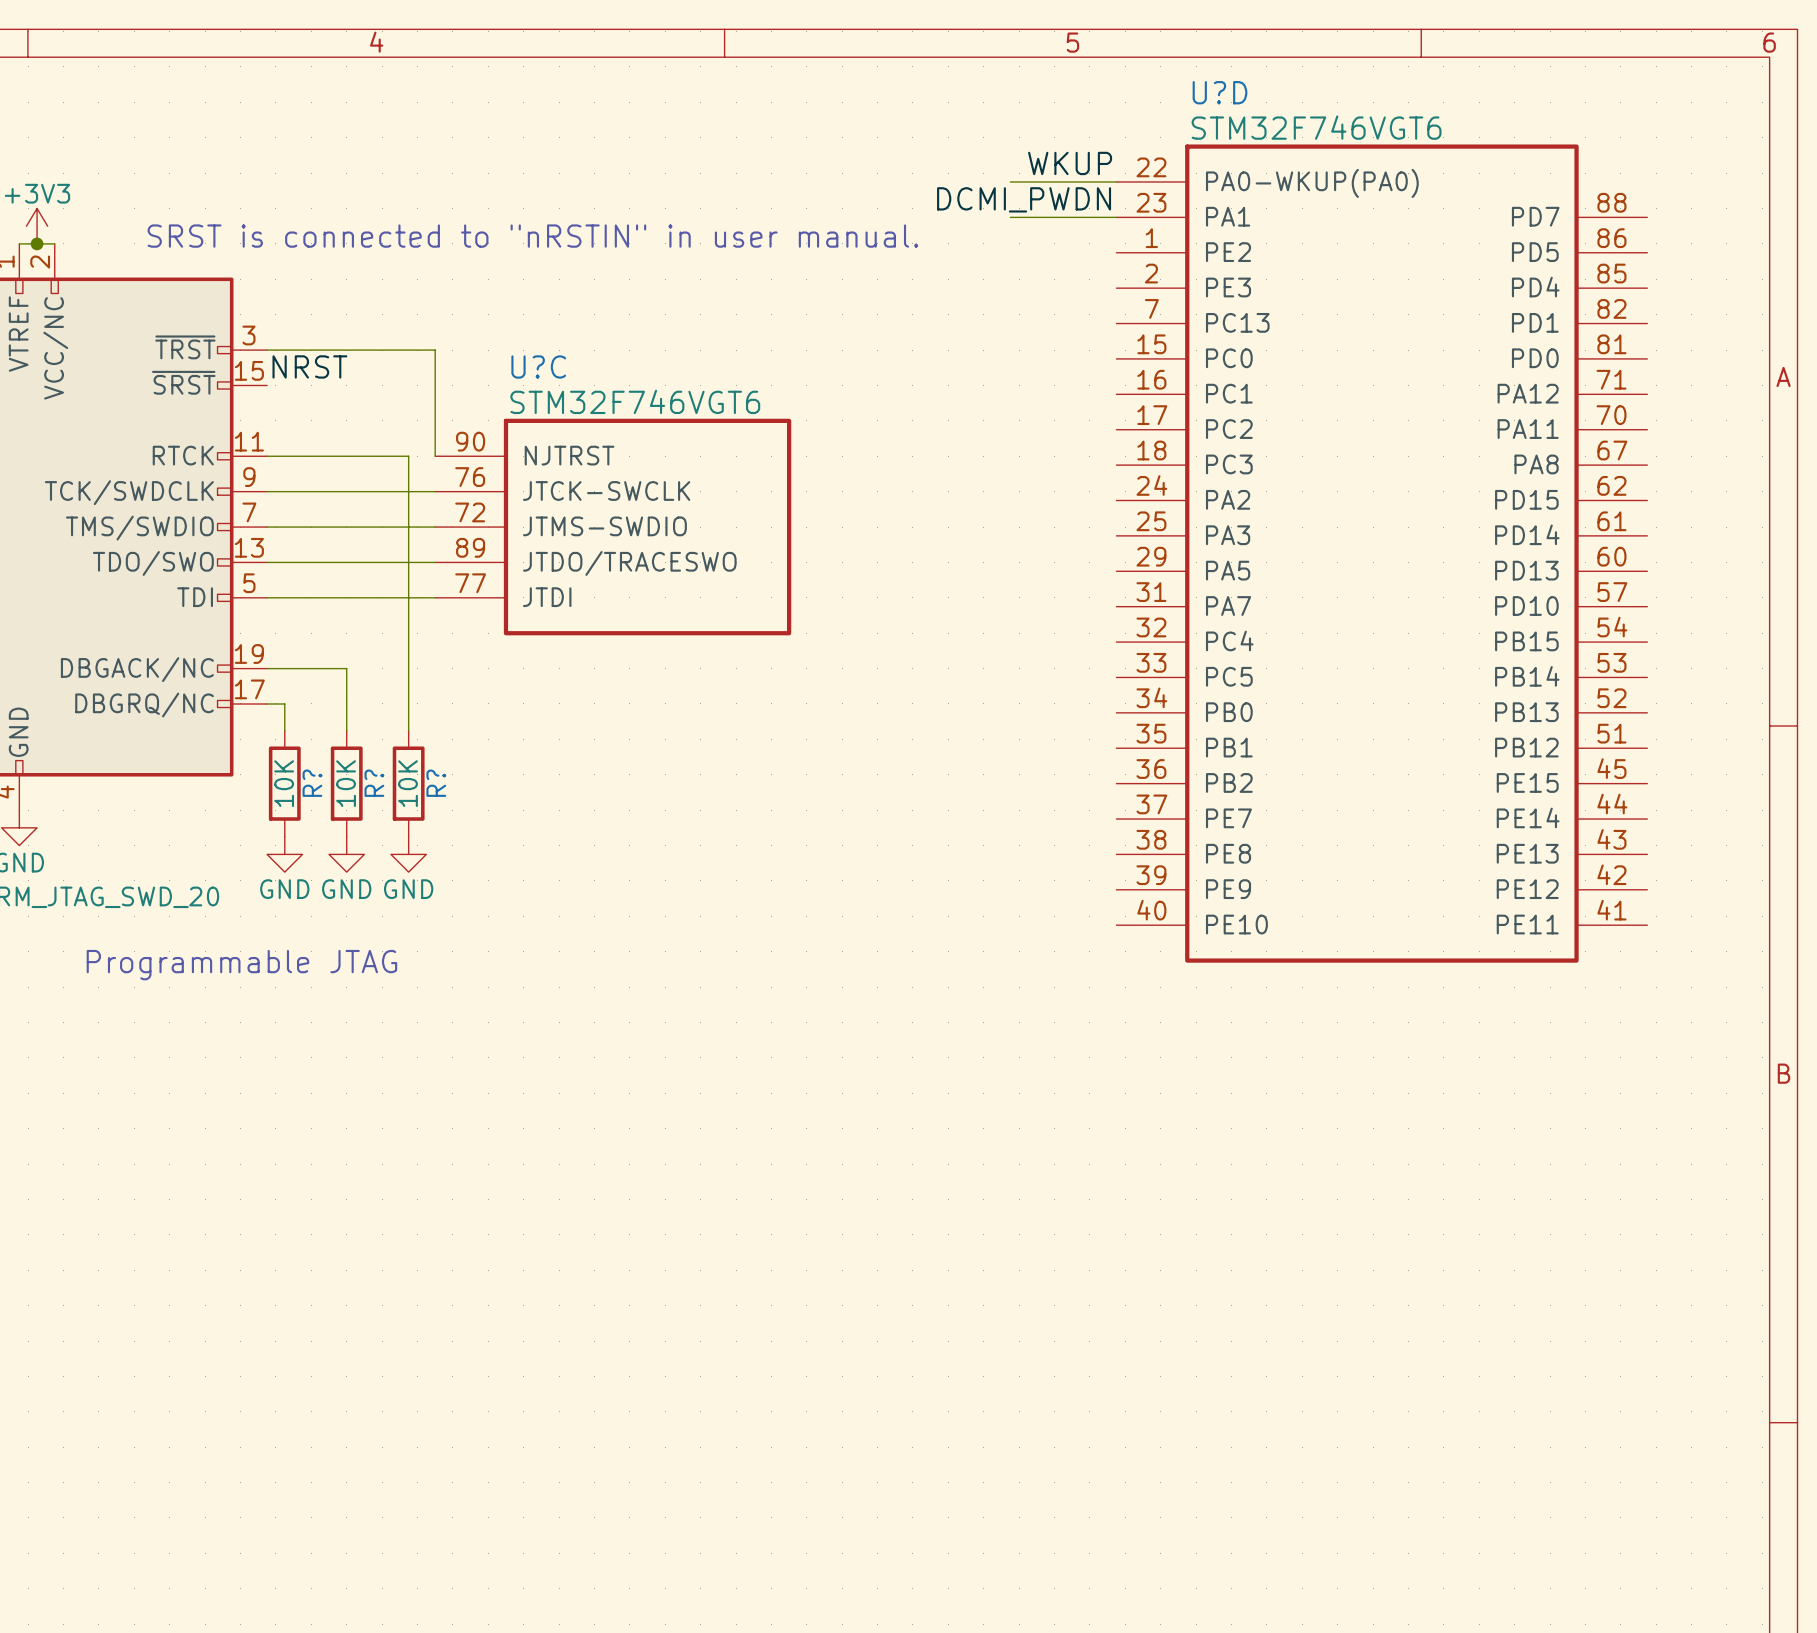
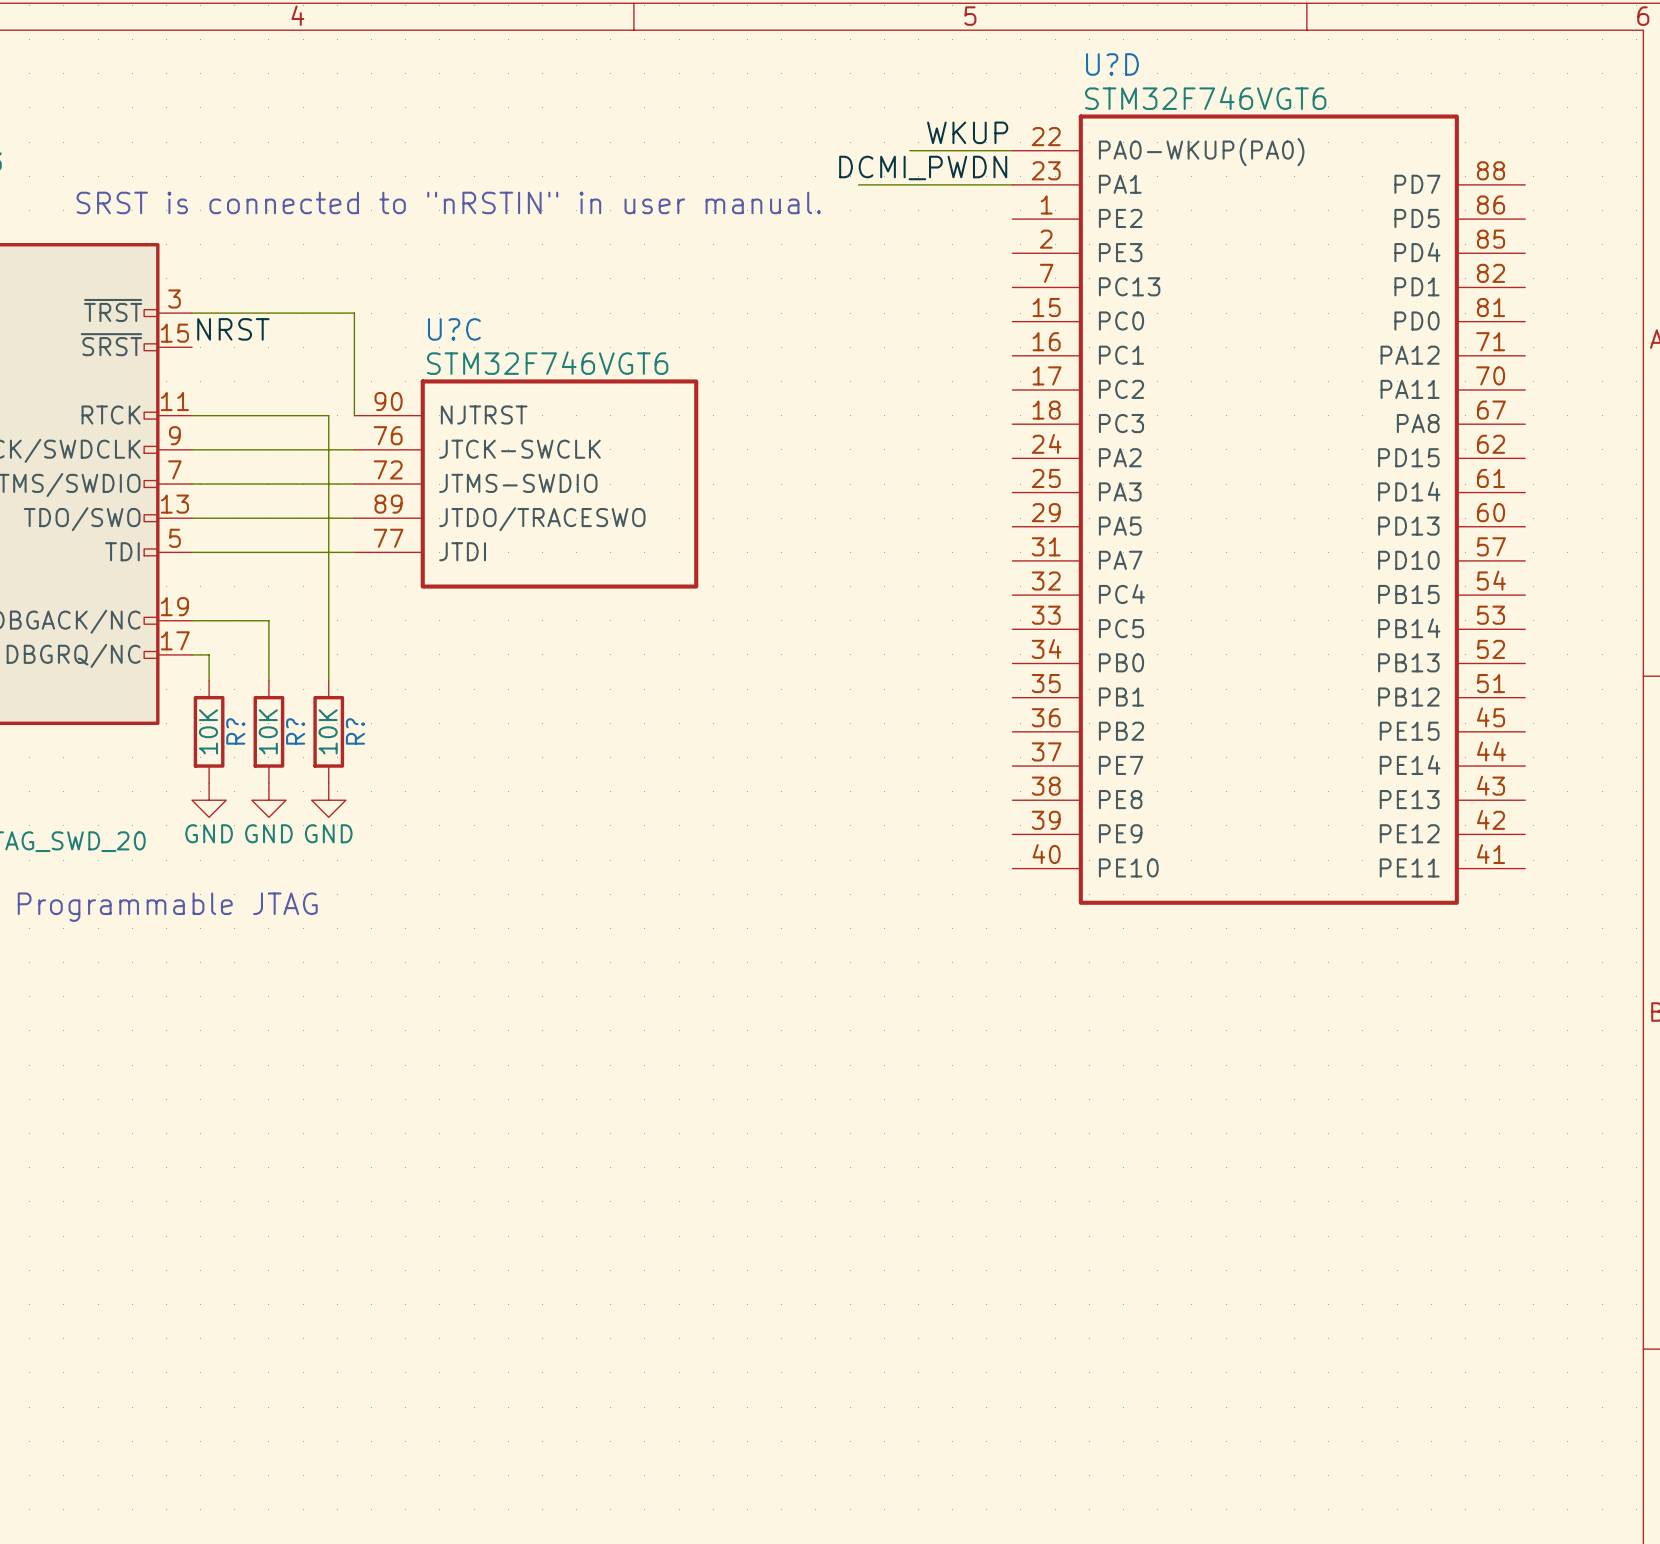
wire: none -> (858, 184) (909, 184)

